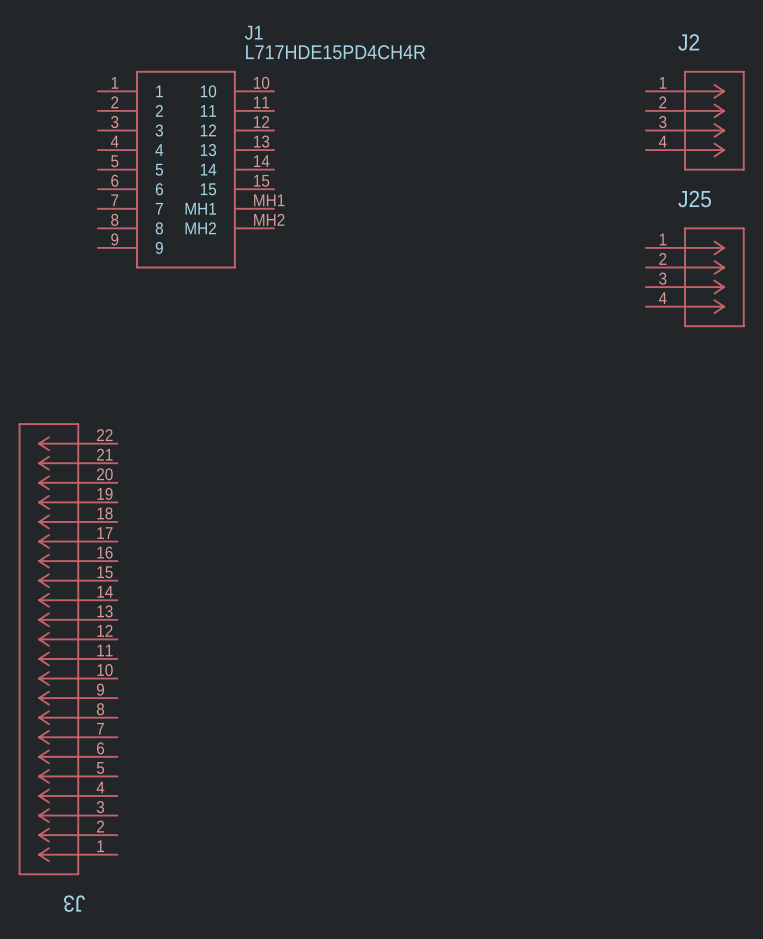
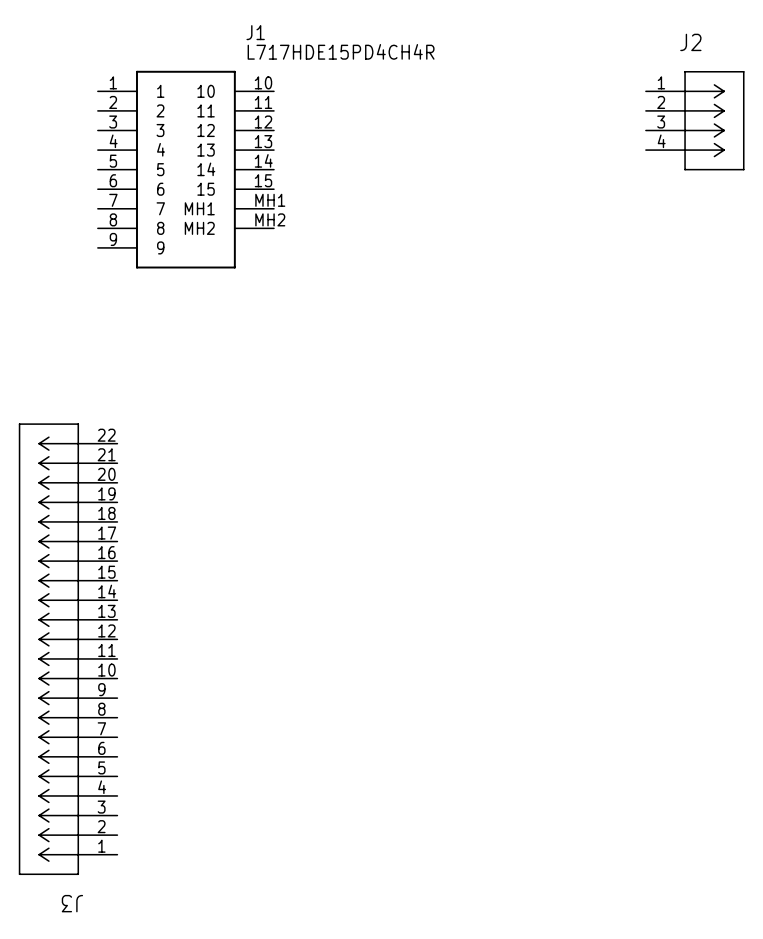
J25: (695, 277) -> none

